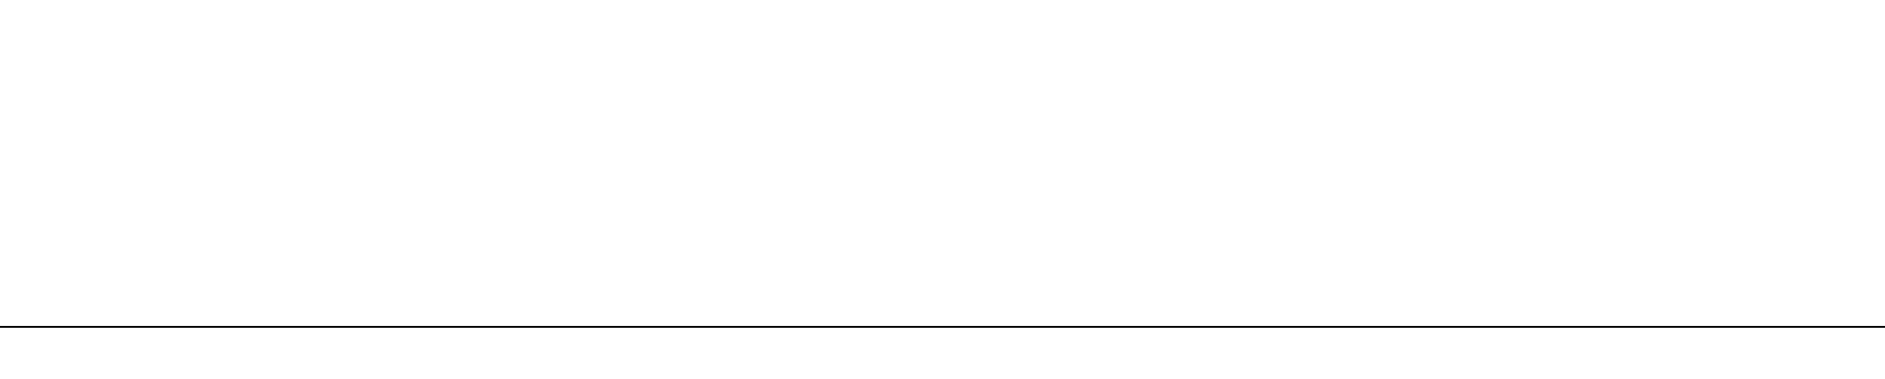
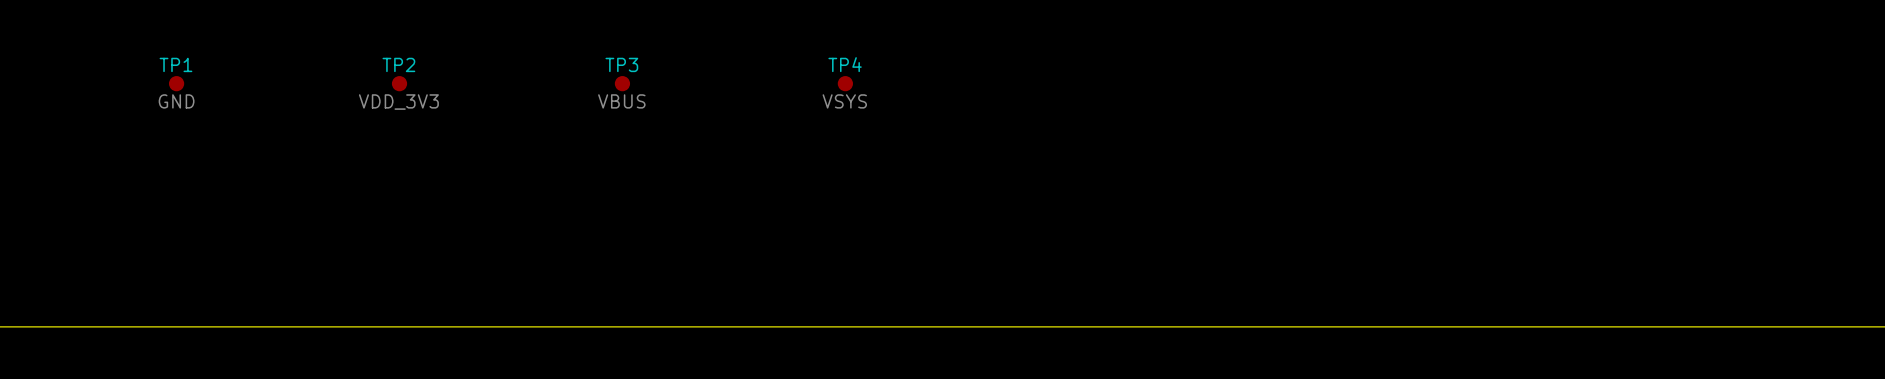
TP1: none -> GND (176, 83)
TP2: none -> VDD_3V3 (399, 83)
TP3: none -> VBUS (622, 83)
TP4: none -> VSYS (845, 83)

